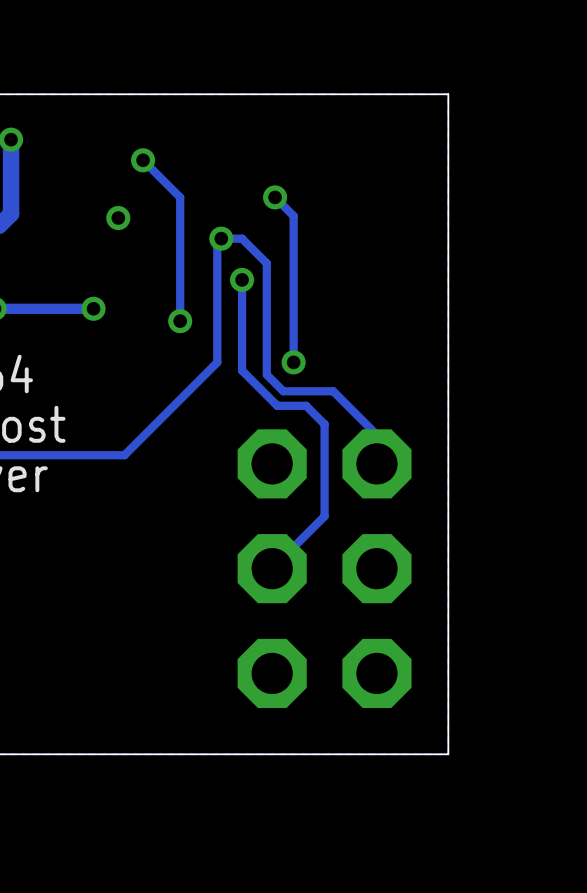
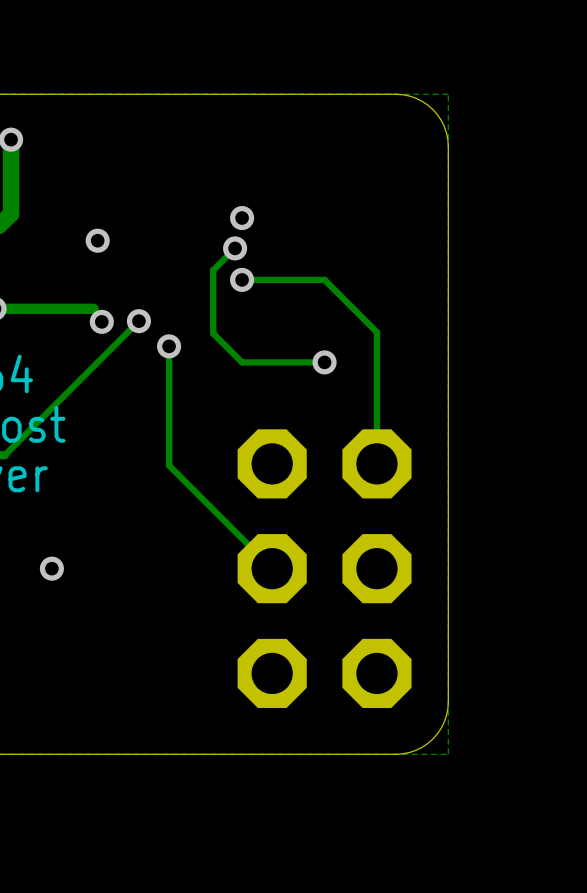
board edge: (395, 94) (448, 94) (448, 146) -> (395, 94) (415, 98) (432, 109) (444, 126) (448, 146)
track: (143, 160) (180, 197) (180, 321) -> none
via: (143, 160) -> none
track: (275, 197) (293, 215) (293, 362) -> none
via: (275, 197) -> none
via position: (118, 218) -> (97, 240)
via: none -> (242, 218)
via: (221, 238) -> none
track: none -> (235, 248) (213, 270) (213, 333) (242, 362) (324, 362)
via: none -> (235, 248)
track: none -> (237, 279) (324, 279) (376, 332) (376, 435)
track: (242, 279) (242, 370) (277, 405) (306, 405) (324, 424) (324, 516) (272, 568) -> (169, 346) (169, 465) (272, 568)
via position: (93, 308) -> (101, 321)
via: none -> (138, 321)
via: (180, 321) -> none
via: none -> (169, 346)
via position: (293, 362) -> (324, 362)
track: (376, 435) (333, 391) (283, 391) (266, 374) (266, 263) (242, 238) (221, 238) (217, 242) (217, 362) (124, 455) (4, 455) -> (138, 321) (4, 455)
via: none -> (51, 568)
board edge: (448, 701) (448, 754) (395, 754) -> (448, 701) (444, 721) (432, 738) (415, 750) (395, 754)

